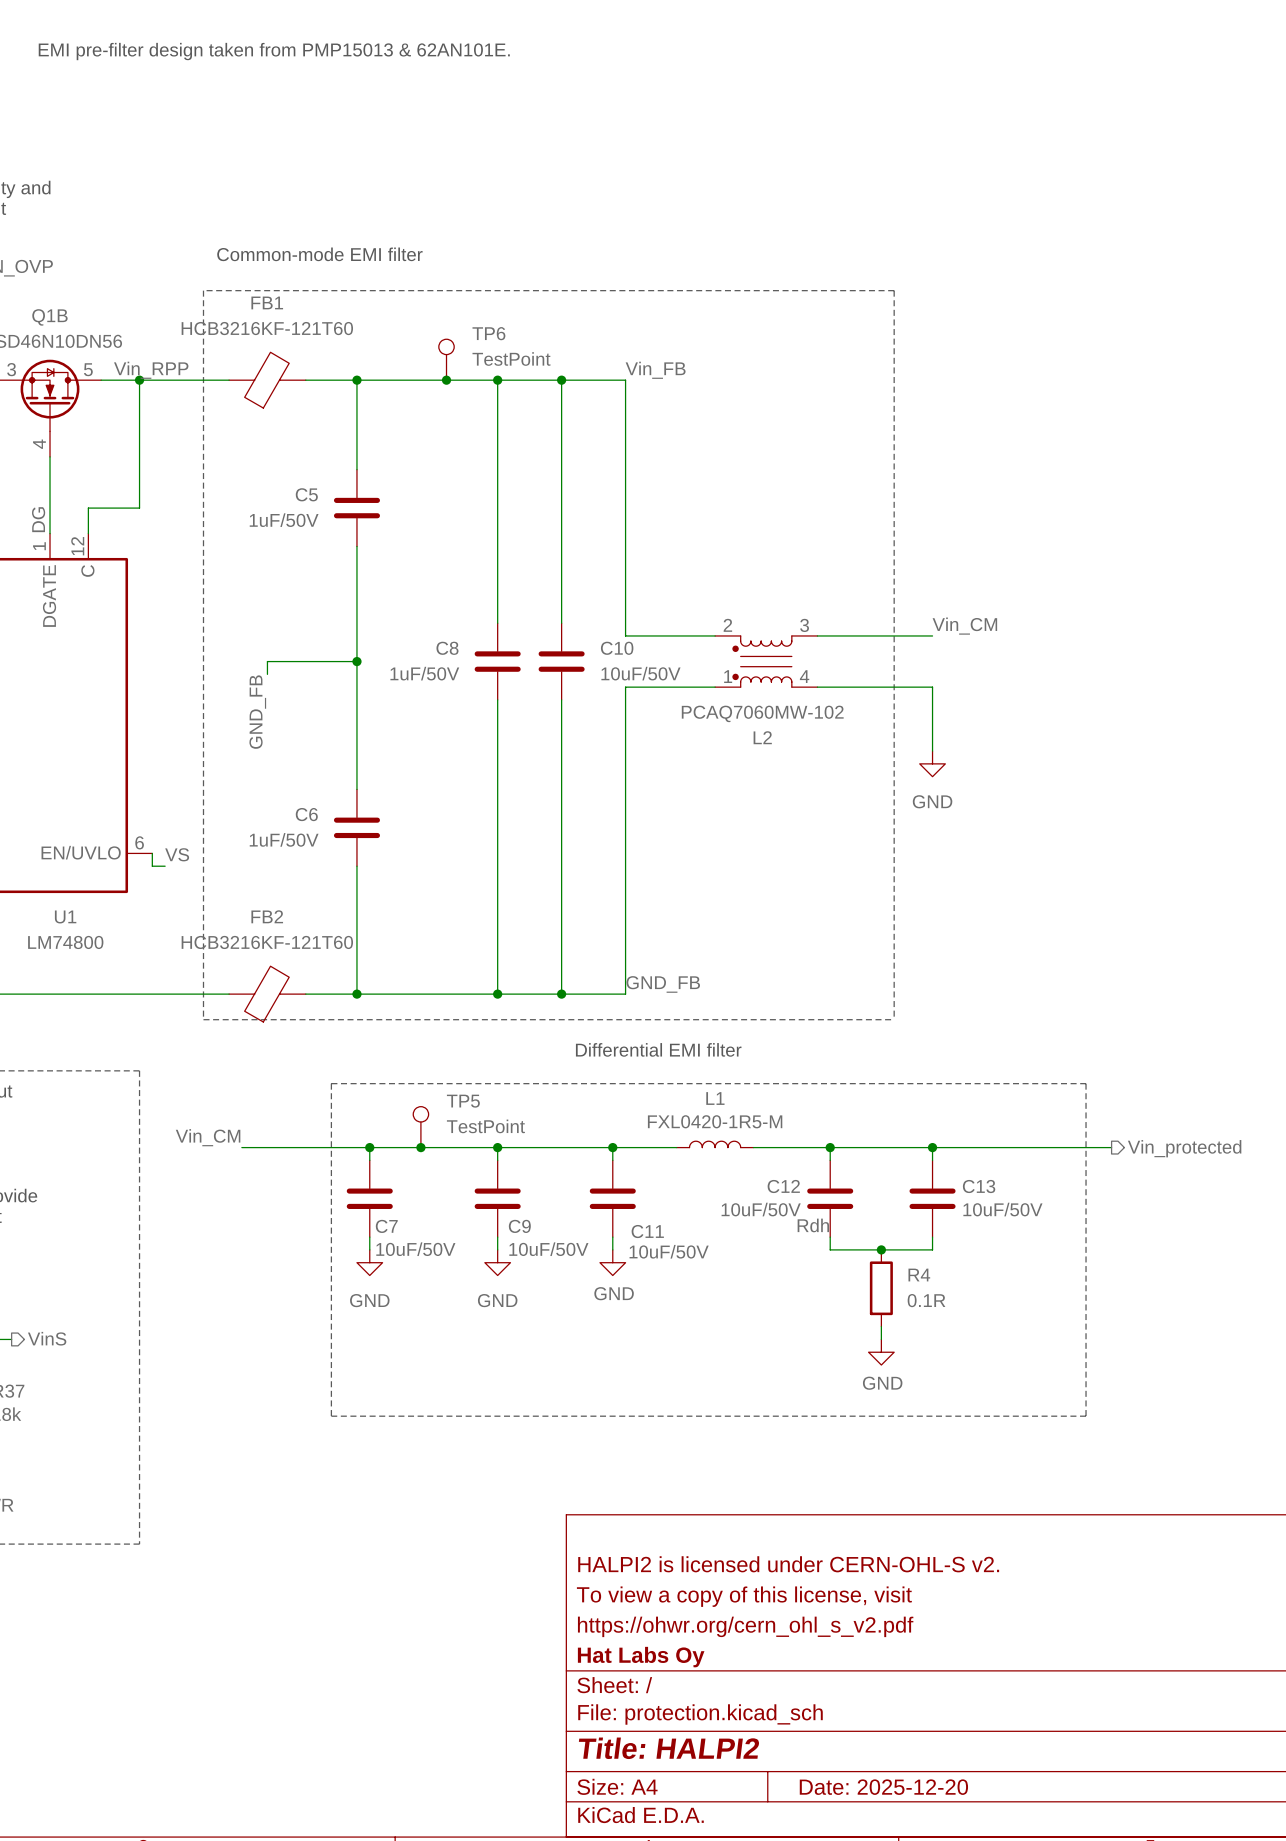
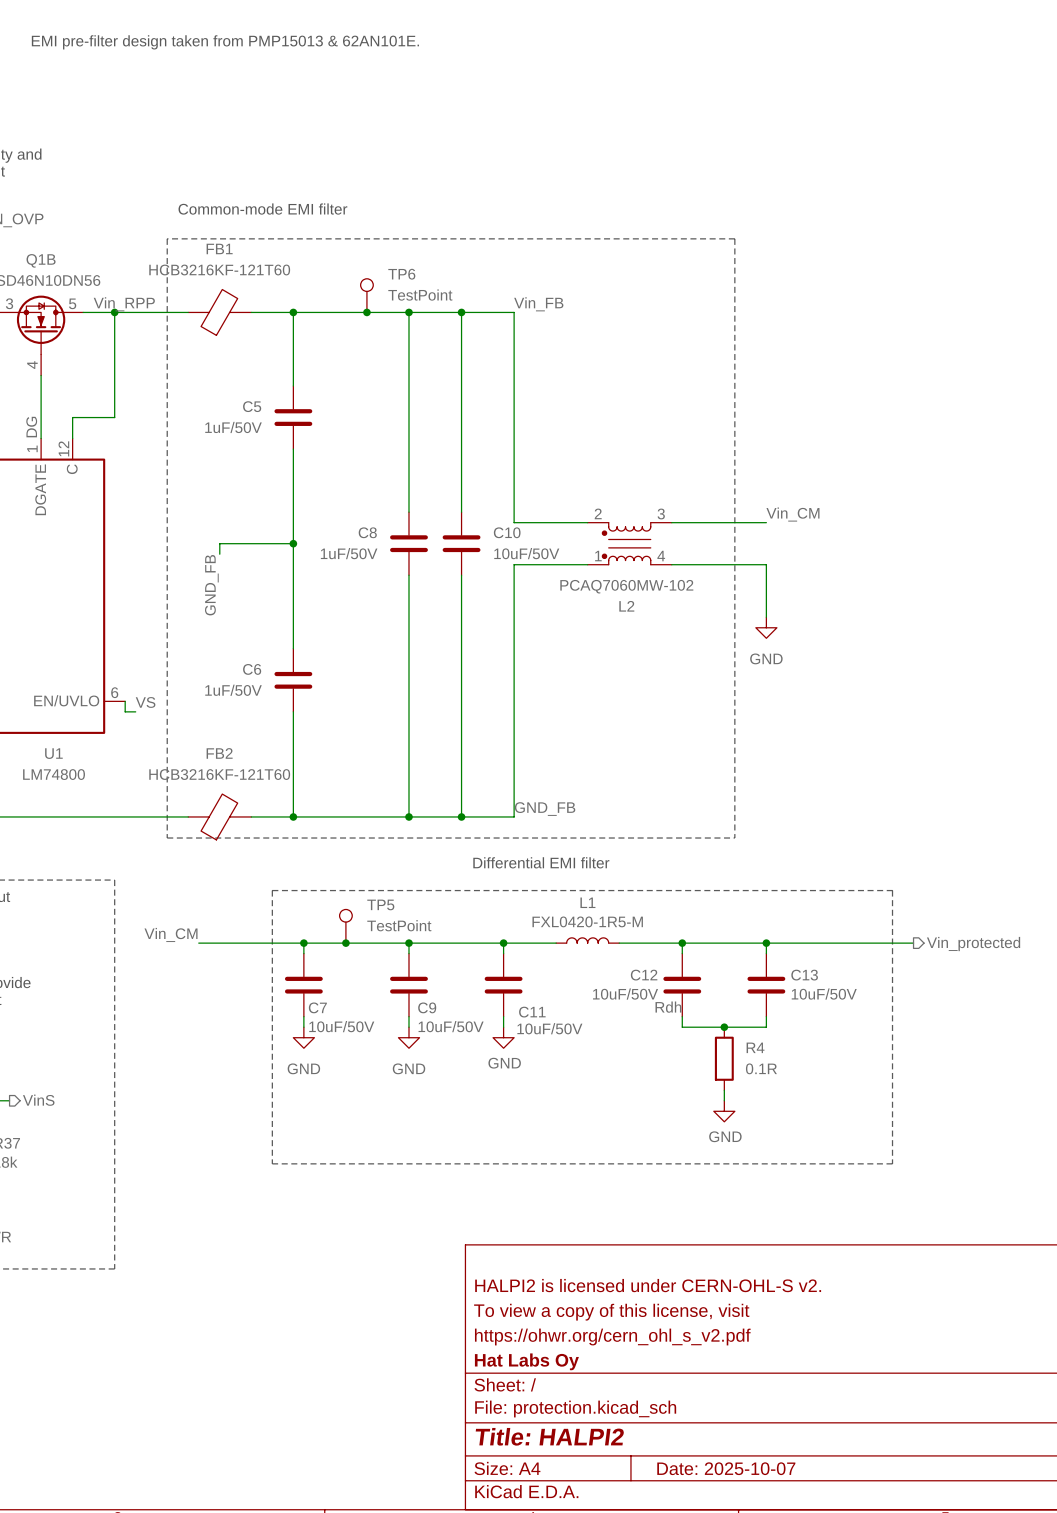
title block: Date: 2025-12-20 (883, 1787) -> Date: 2025-10-07 (726, 1468)

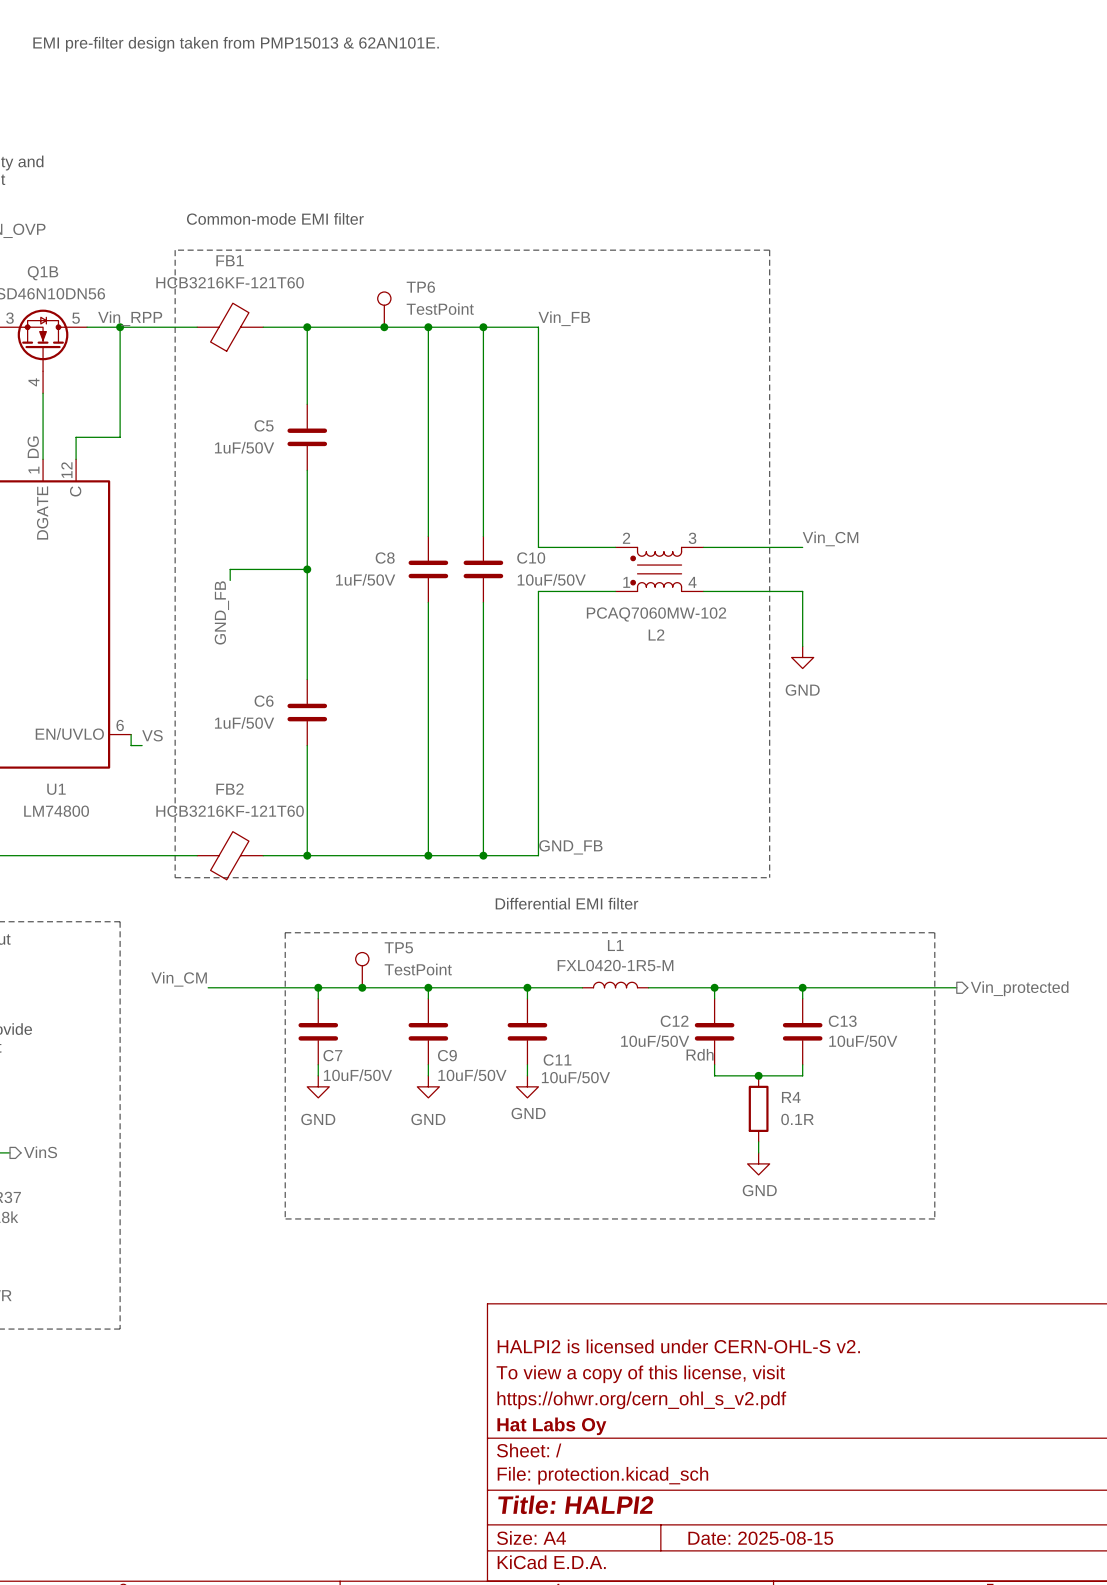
title block: Date: 2025-10-07 (726, 1468) -> Date: 2025-08-15 (760, 1538)

